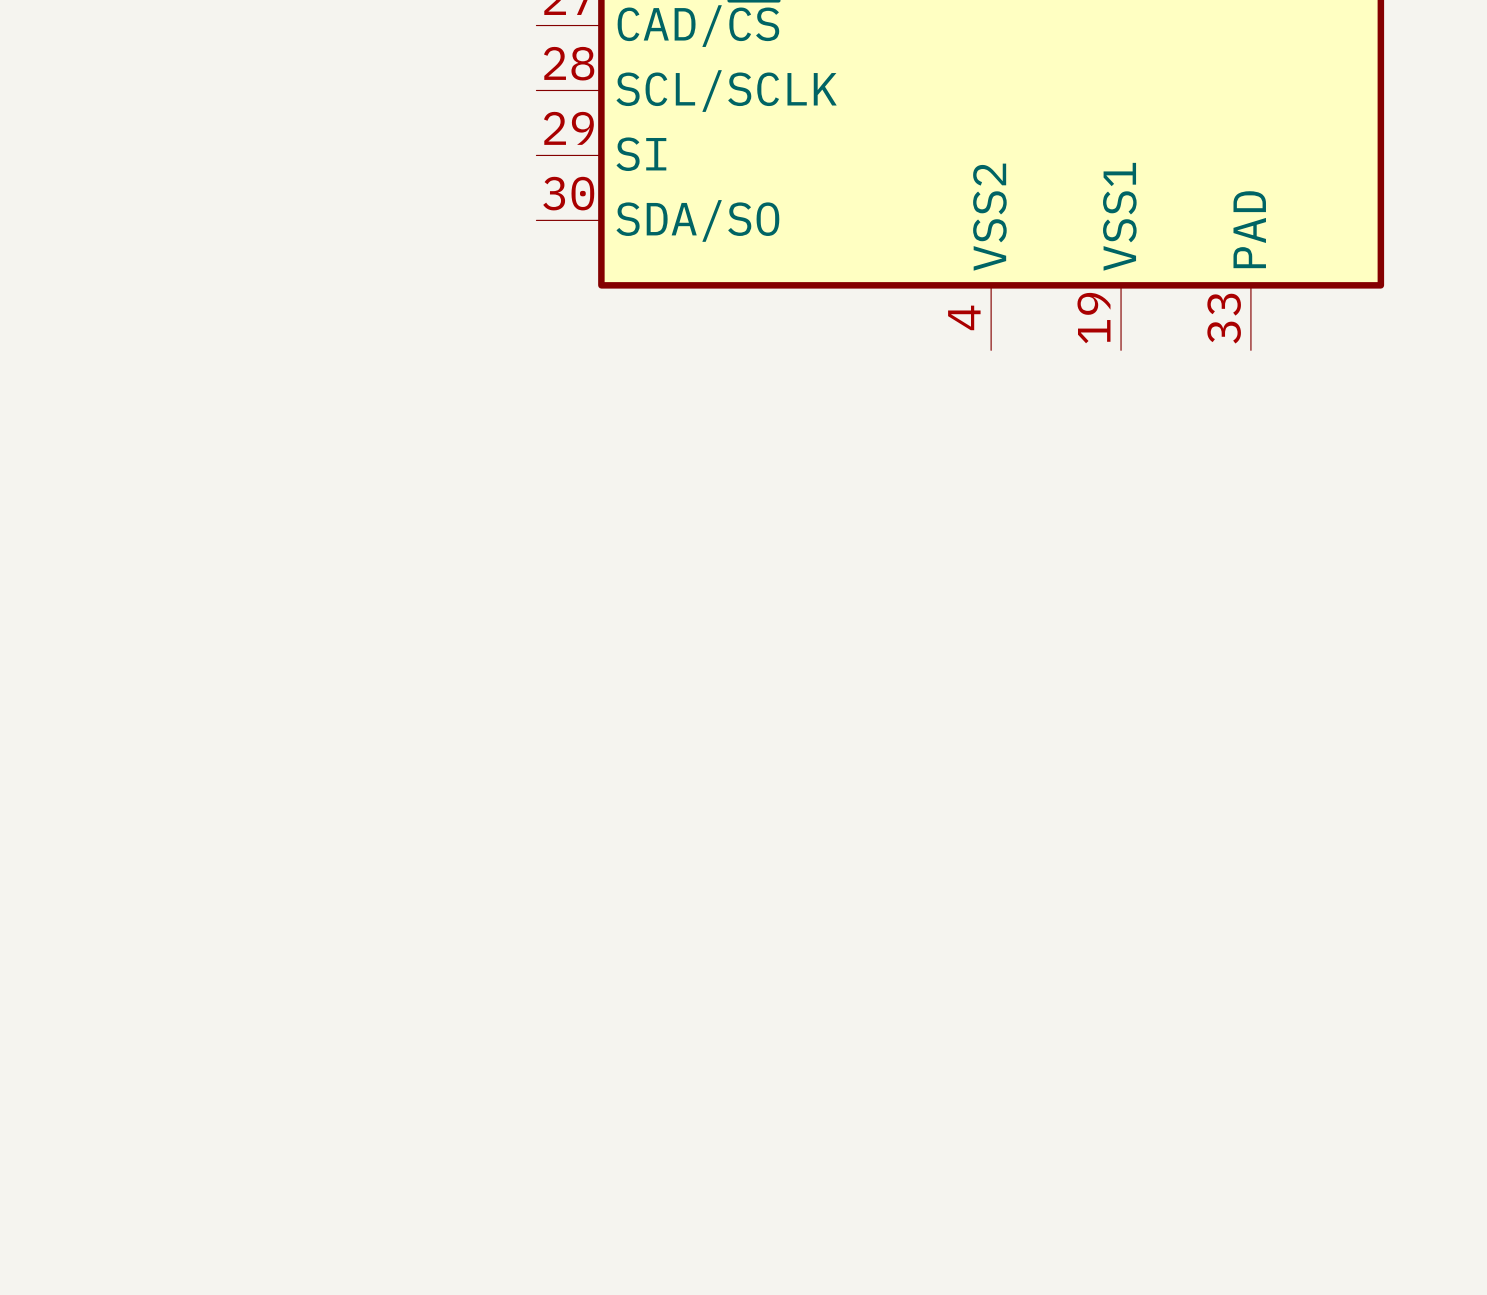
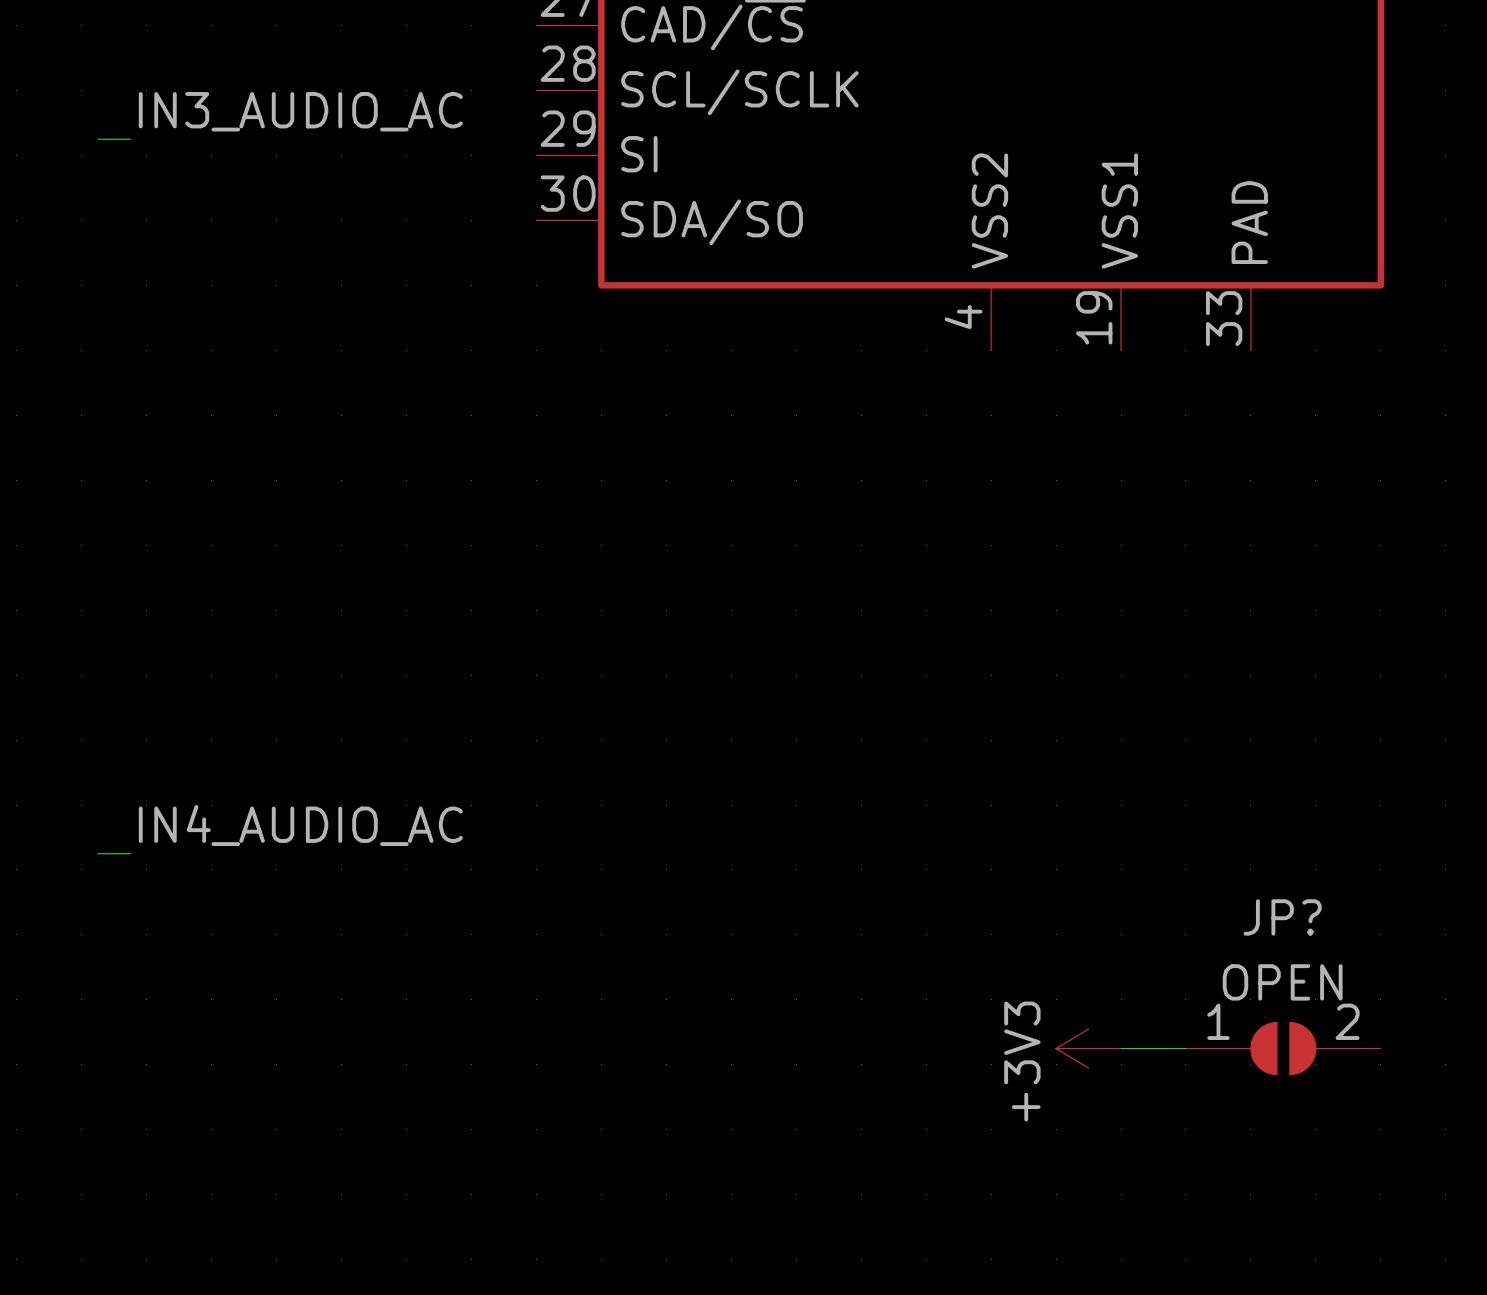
label: none -> IN3_AUDIO_AC (300, 111)
wire: none -> (97, 139) (130, 139)
label: none -> IN4_AUDIO_AC (300, 825)
wire: none -> (97, 853) (130, 853)
power symbol: none -> +3V3 (1088, 1048)
wire: none -> (1121, 1048) (1185, 1048)
JP?: none -> OPEN (1283, 1048)

